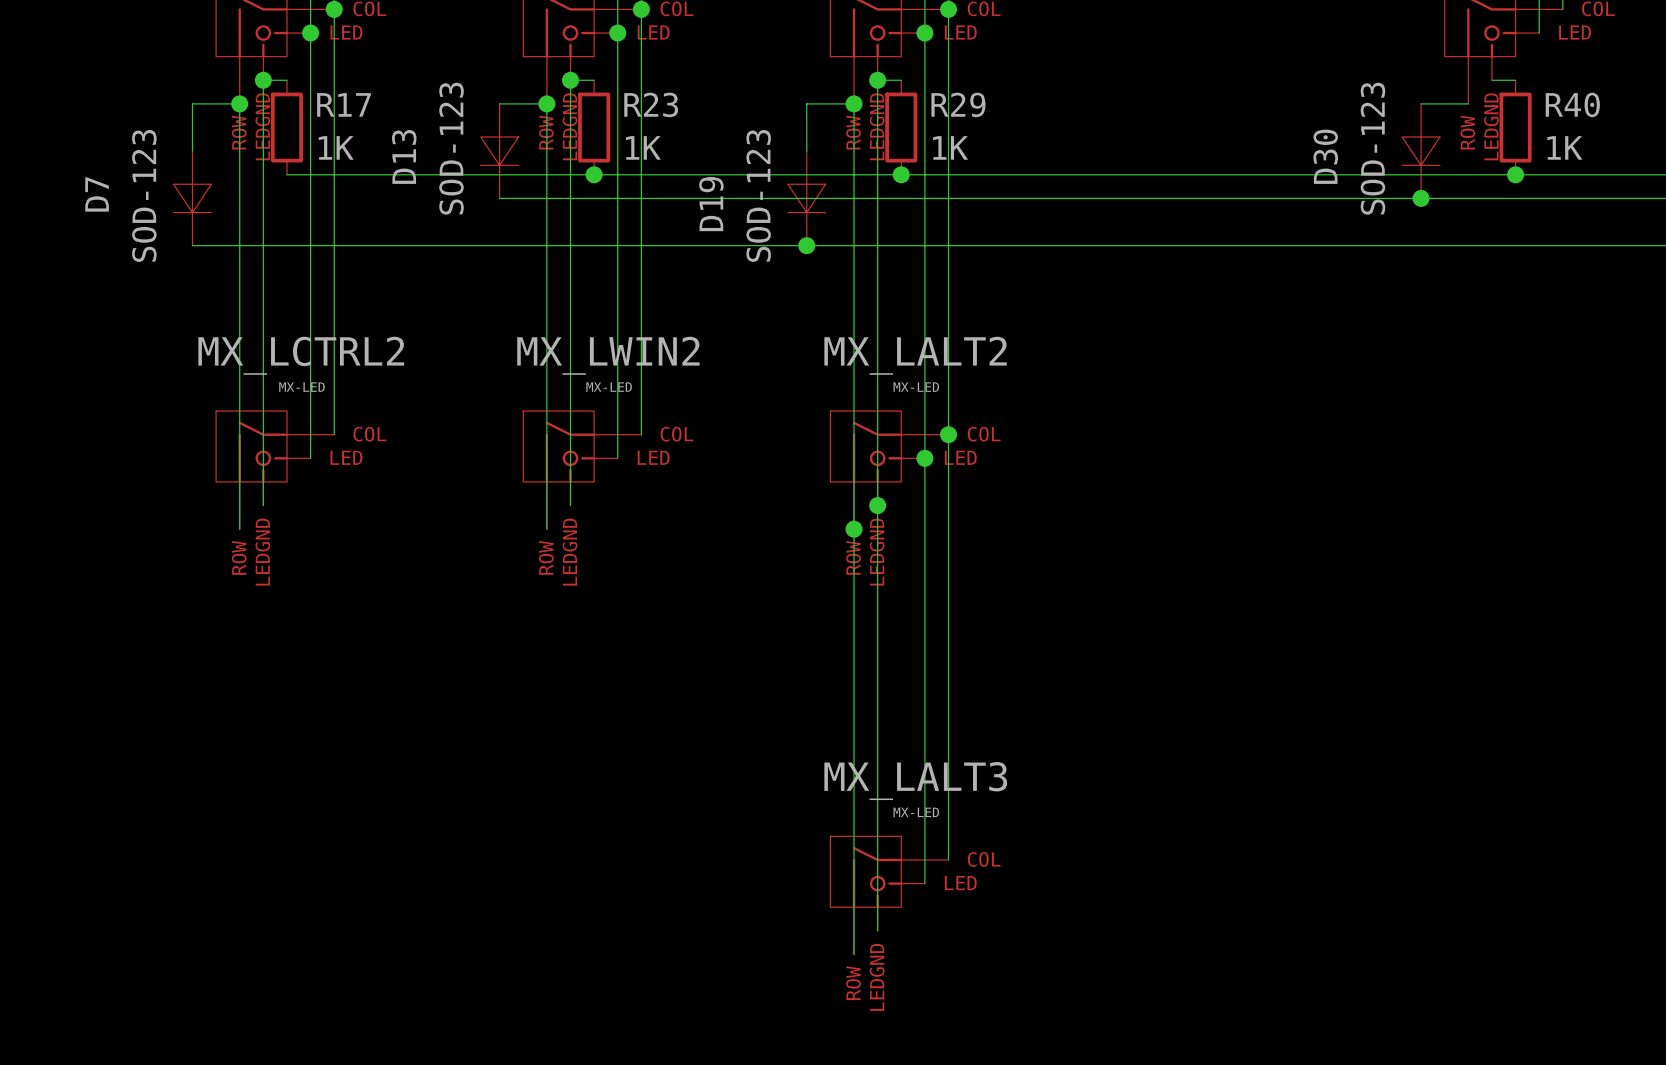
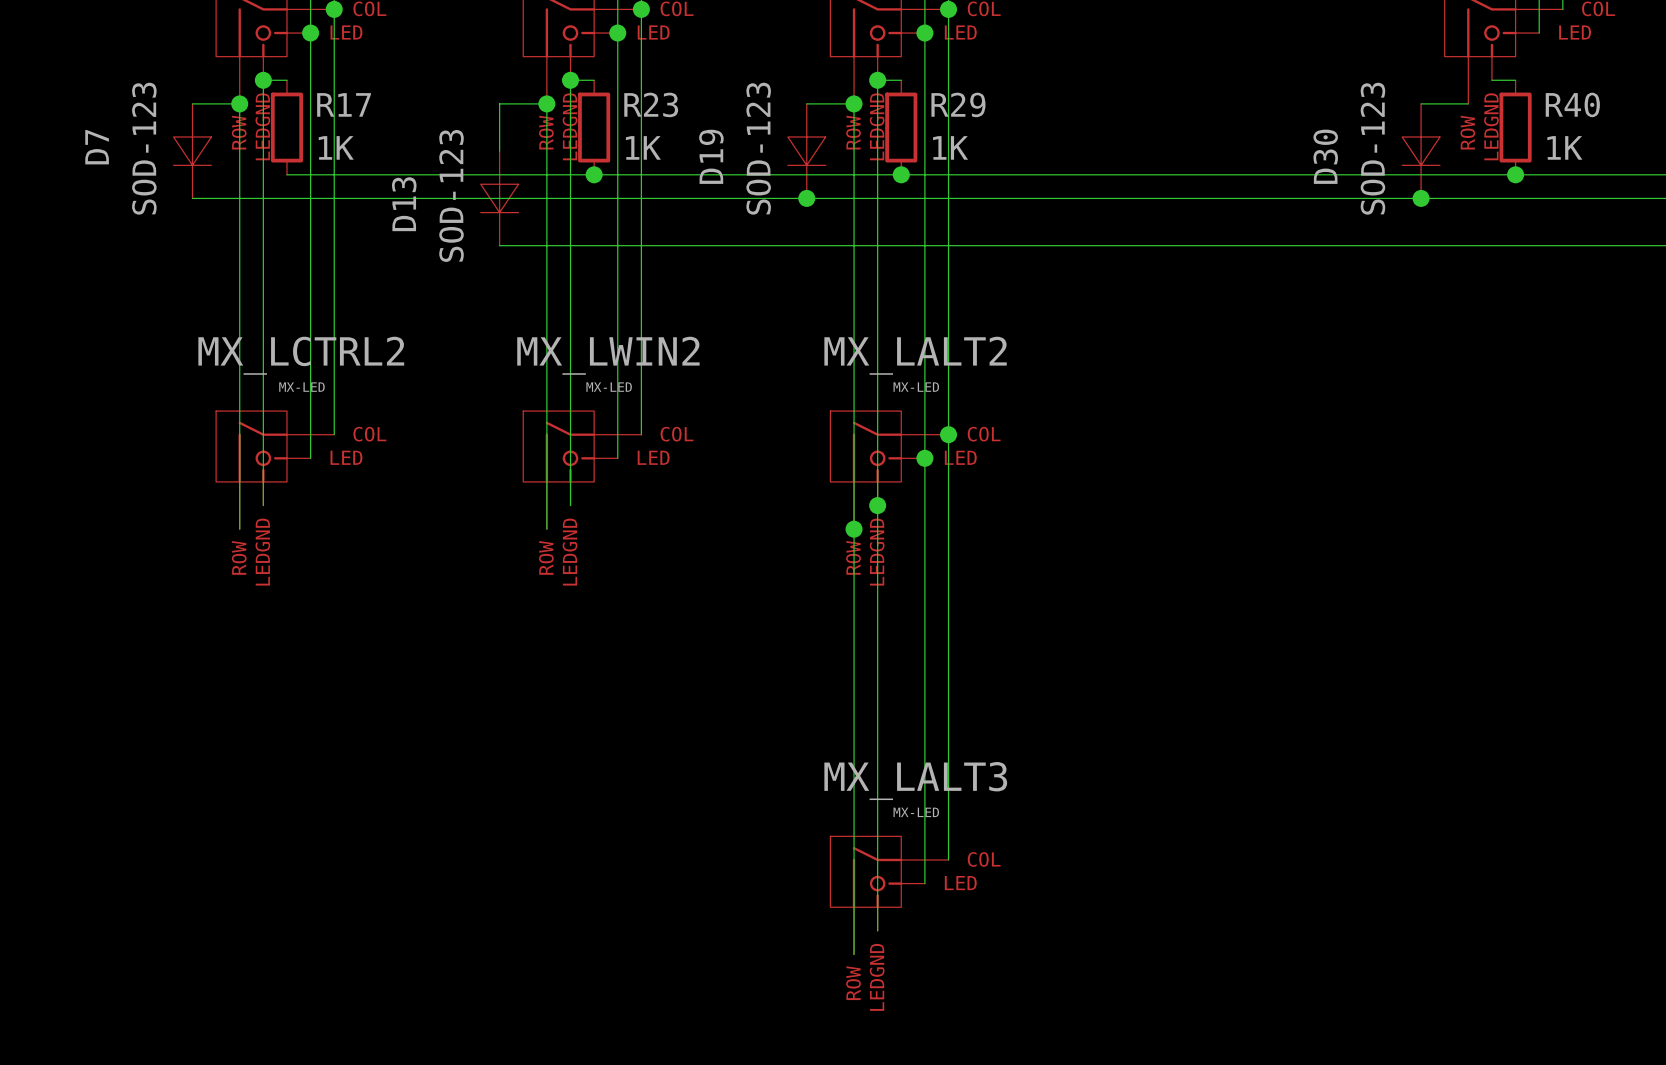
D13 position: (499, 151) -> (499, 198)
D7 position: (192, 198) -> (192, 151)
D19 position: (806, 198) -> (806, 151)
wire: (192, 245) (499, 245) -> (192, 198) (499, 198)
junction position: (806, 245) -> (806, 198)

